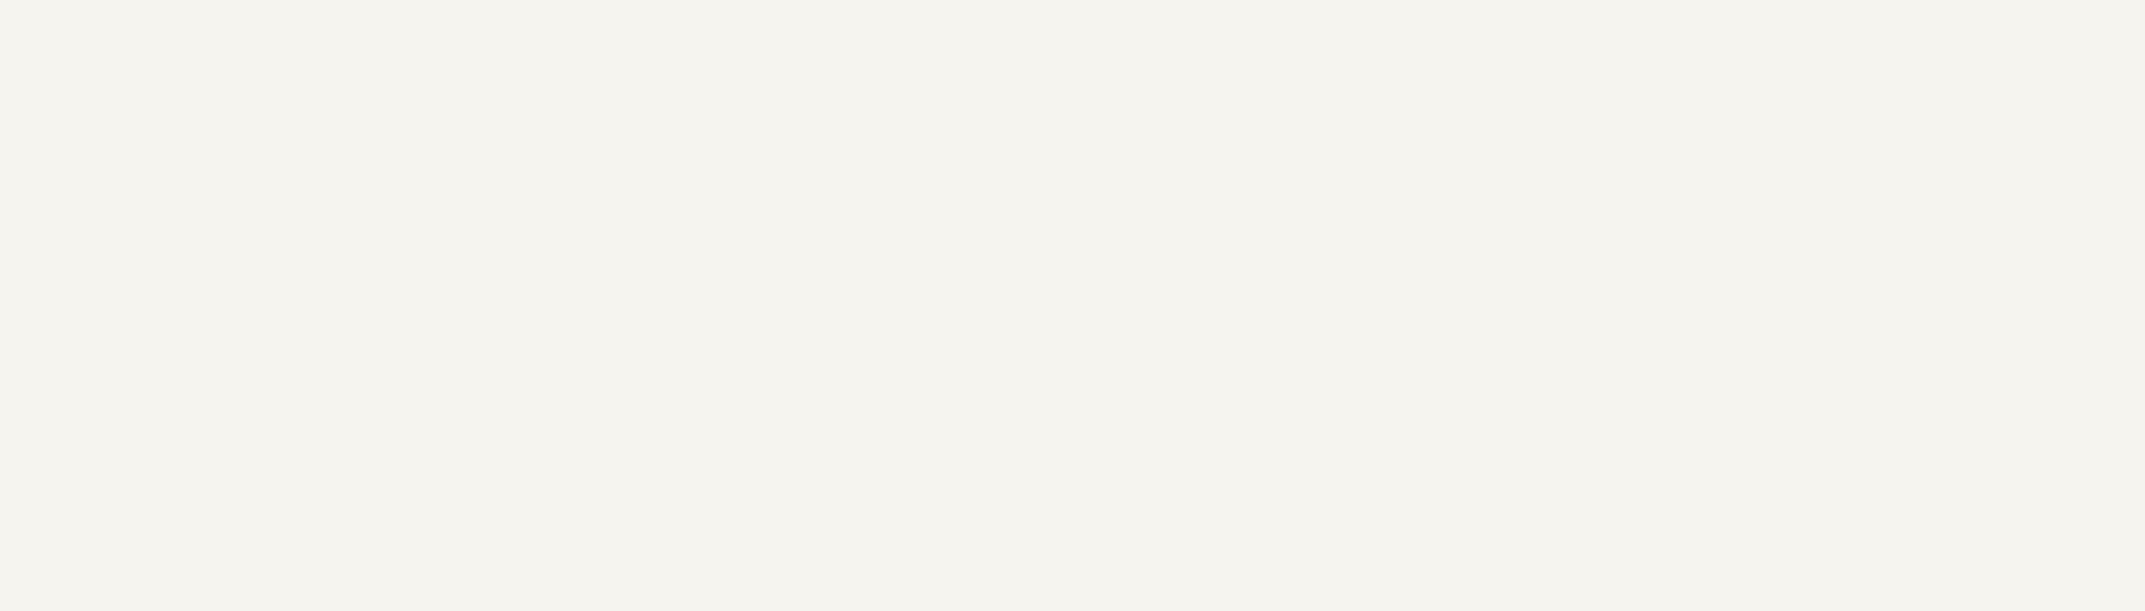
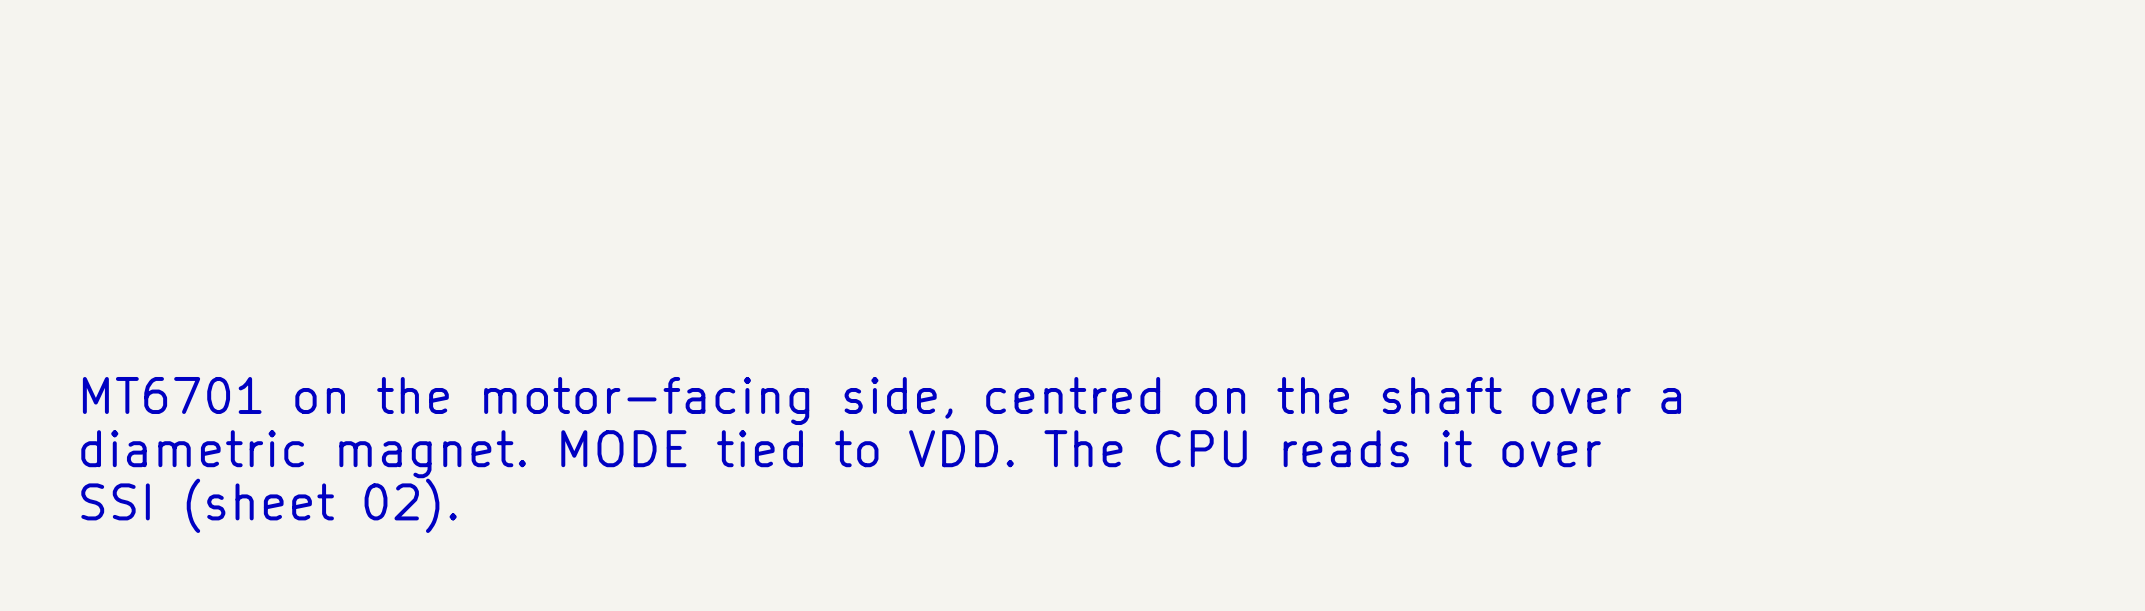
text: none -> MT6701 on the motor-facing side, centred on the shaft over a (881, 400)
text: none -> diametric magnet. MODE tied to VDD. The CPU reads it over (841, 454)
text: none -> SSI (sheet 02). (268, 505)

